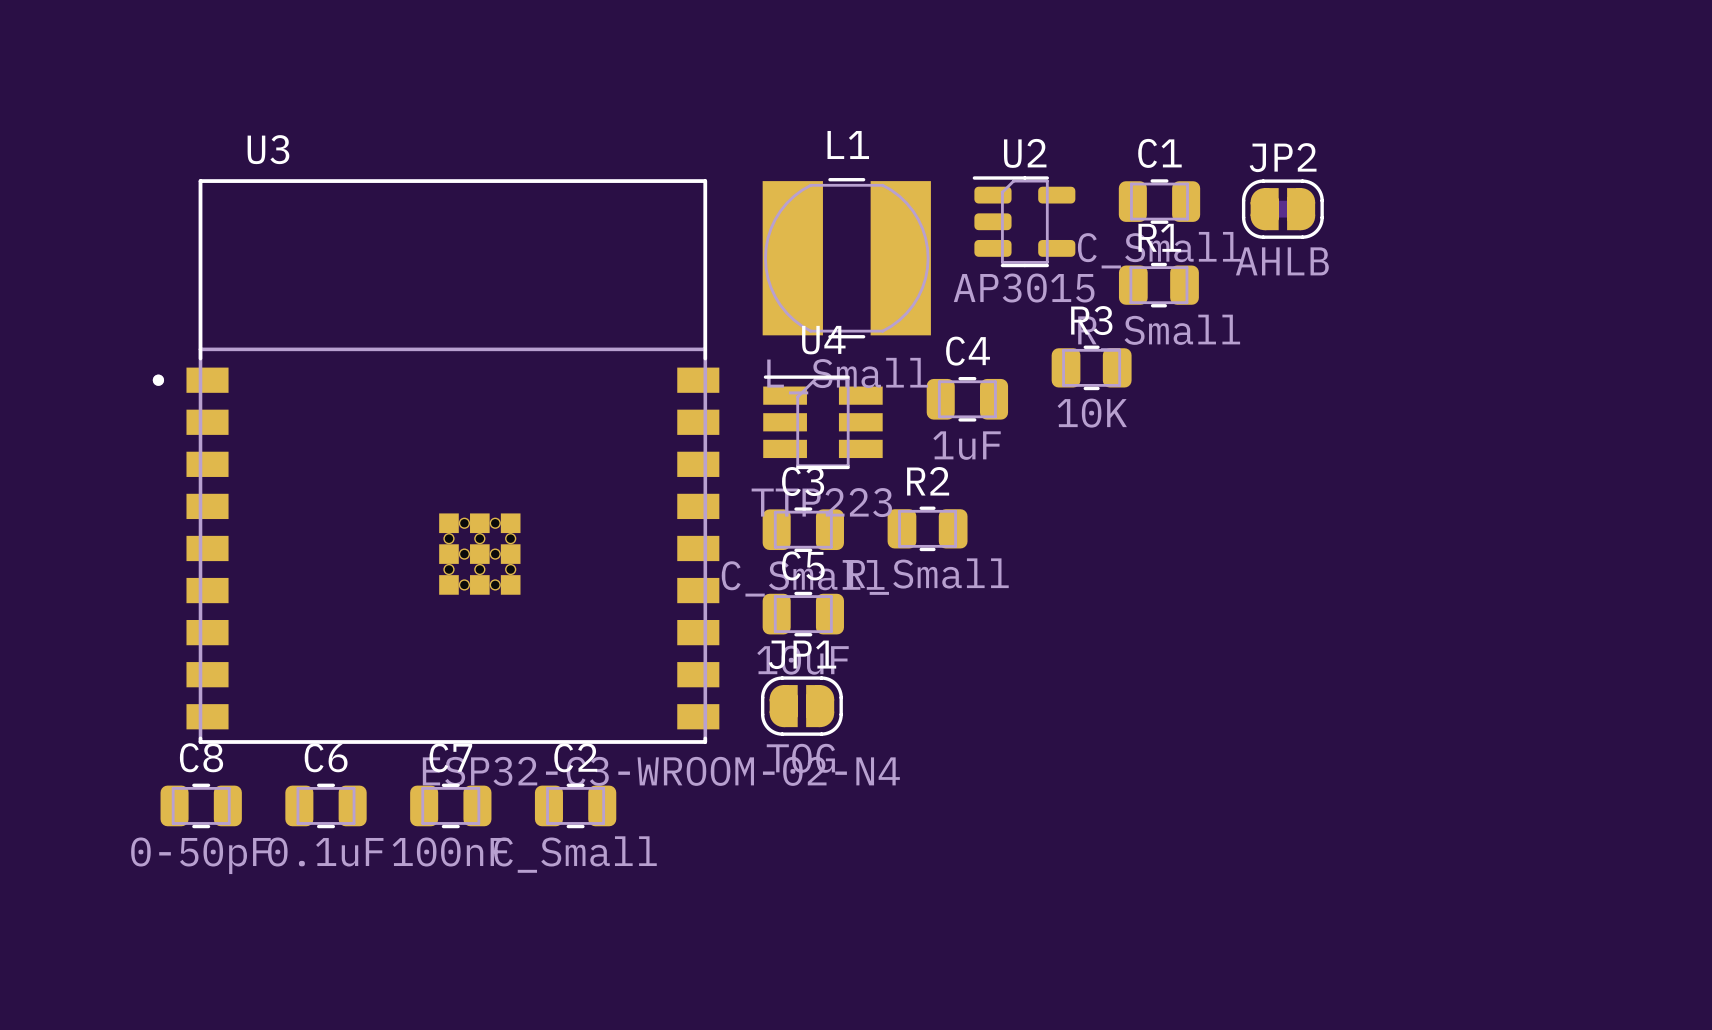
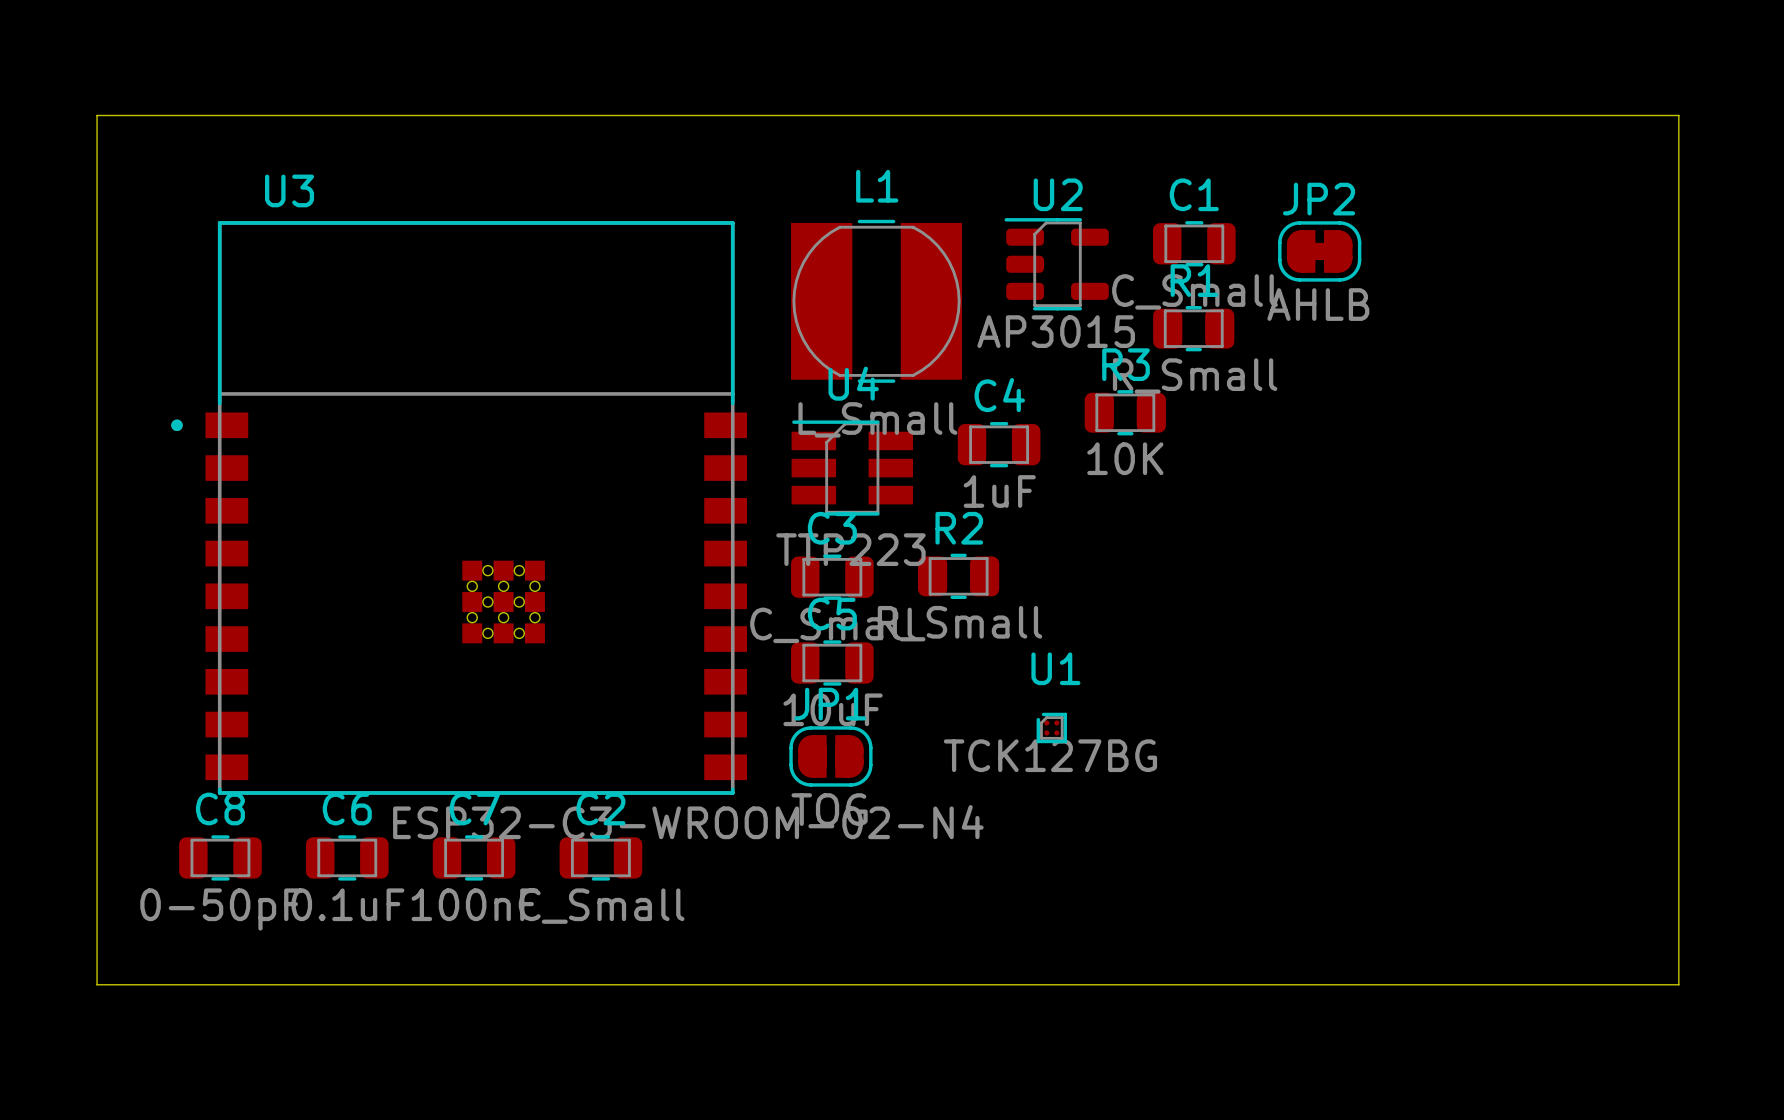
board edge: none -> (97, 115) (97, 984) (1678, 984) (1678, 115) (97, 115)
U1: none -> TCK127BG (1051, 727)

